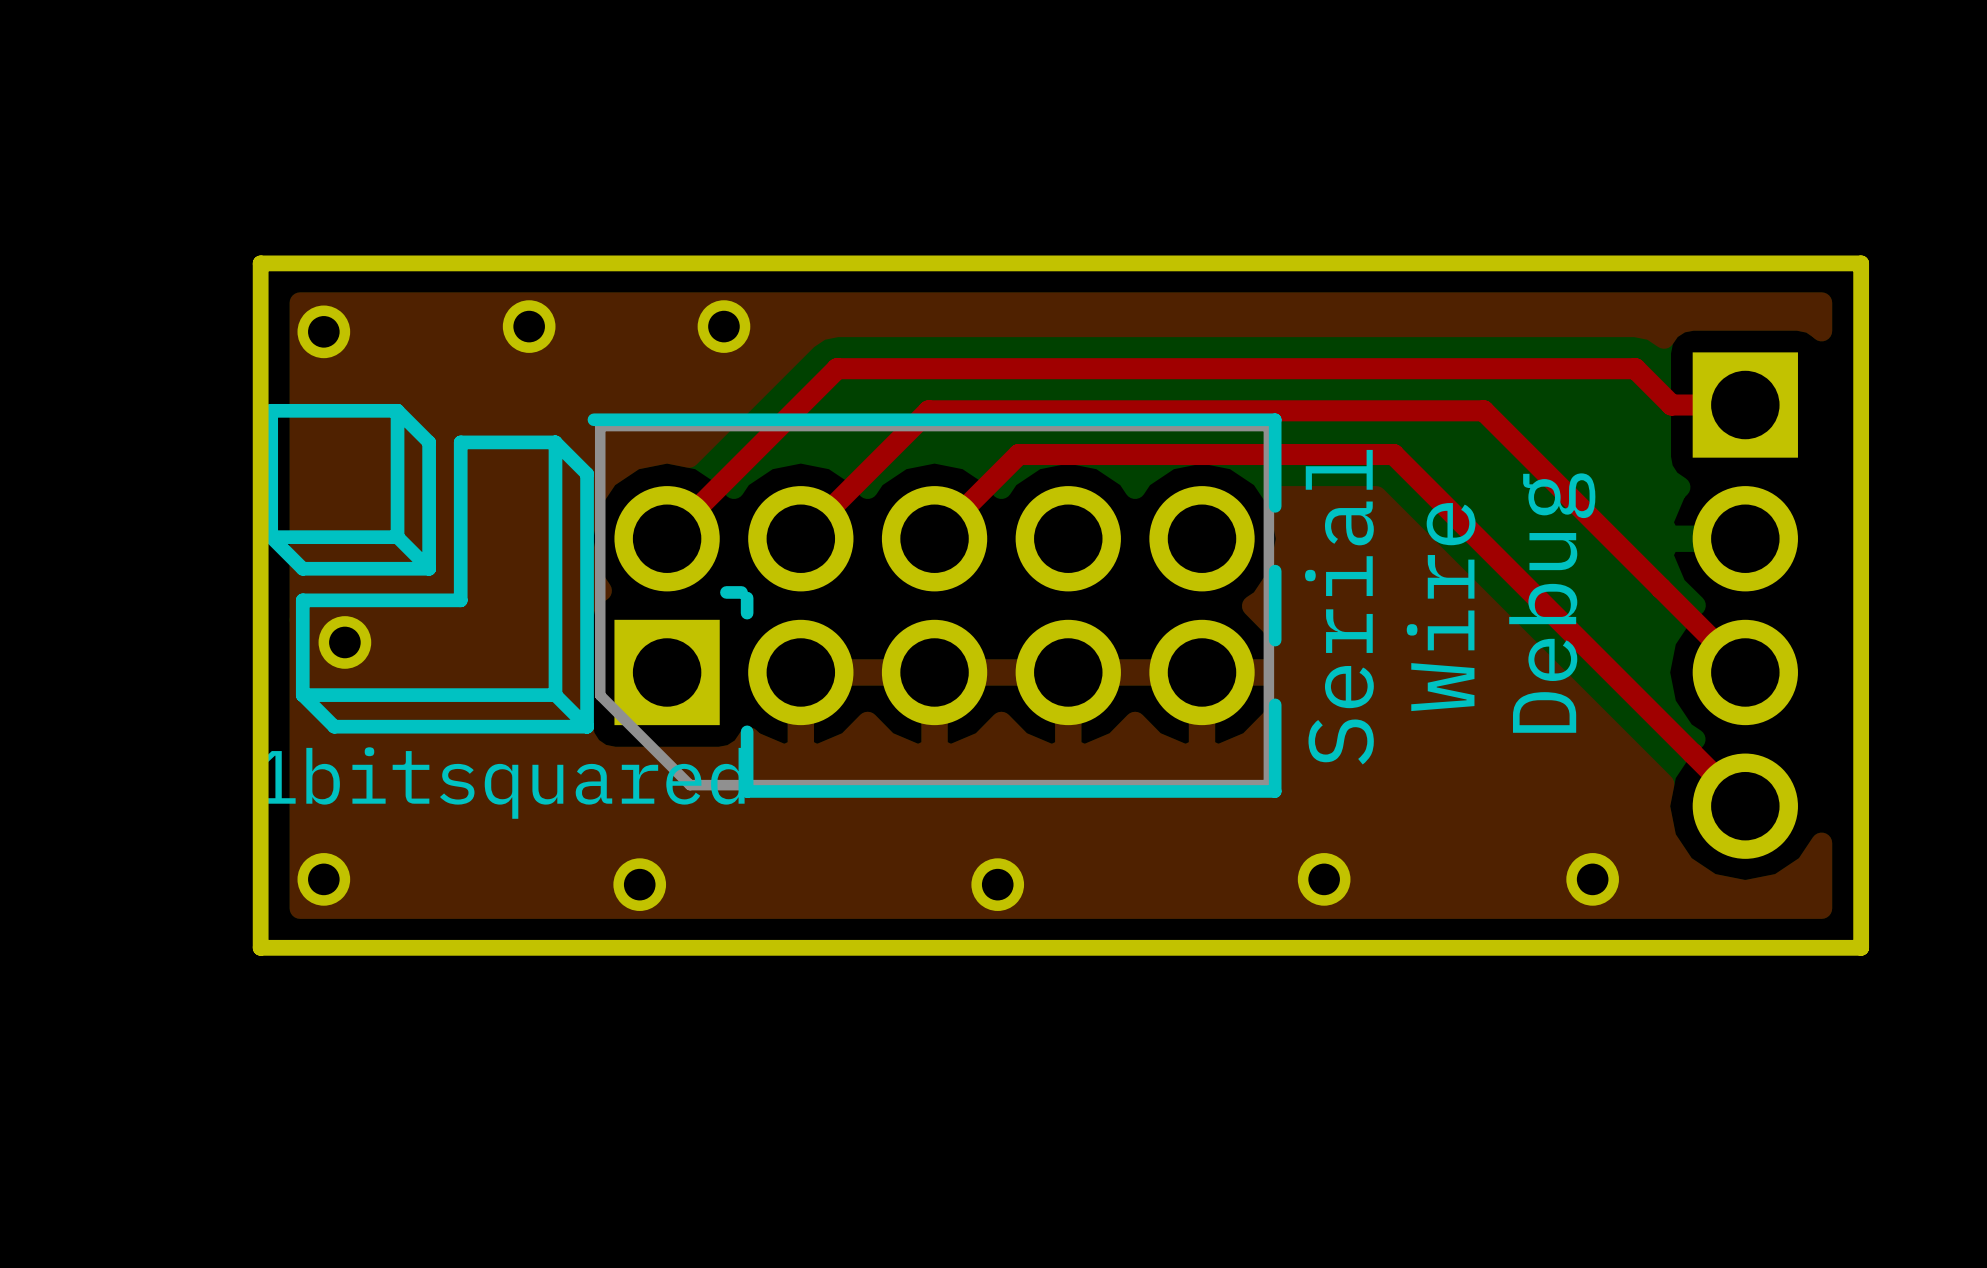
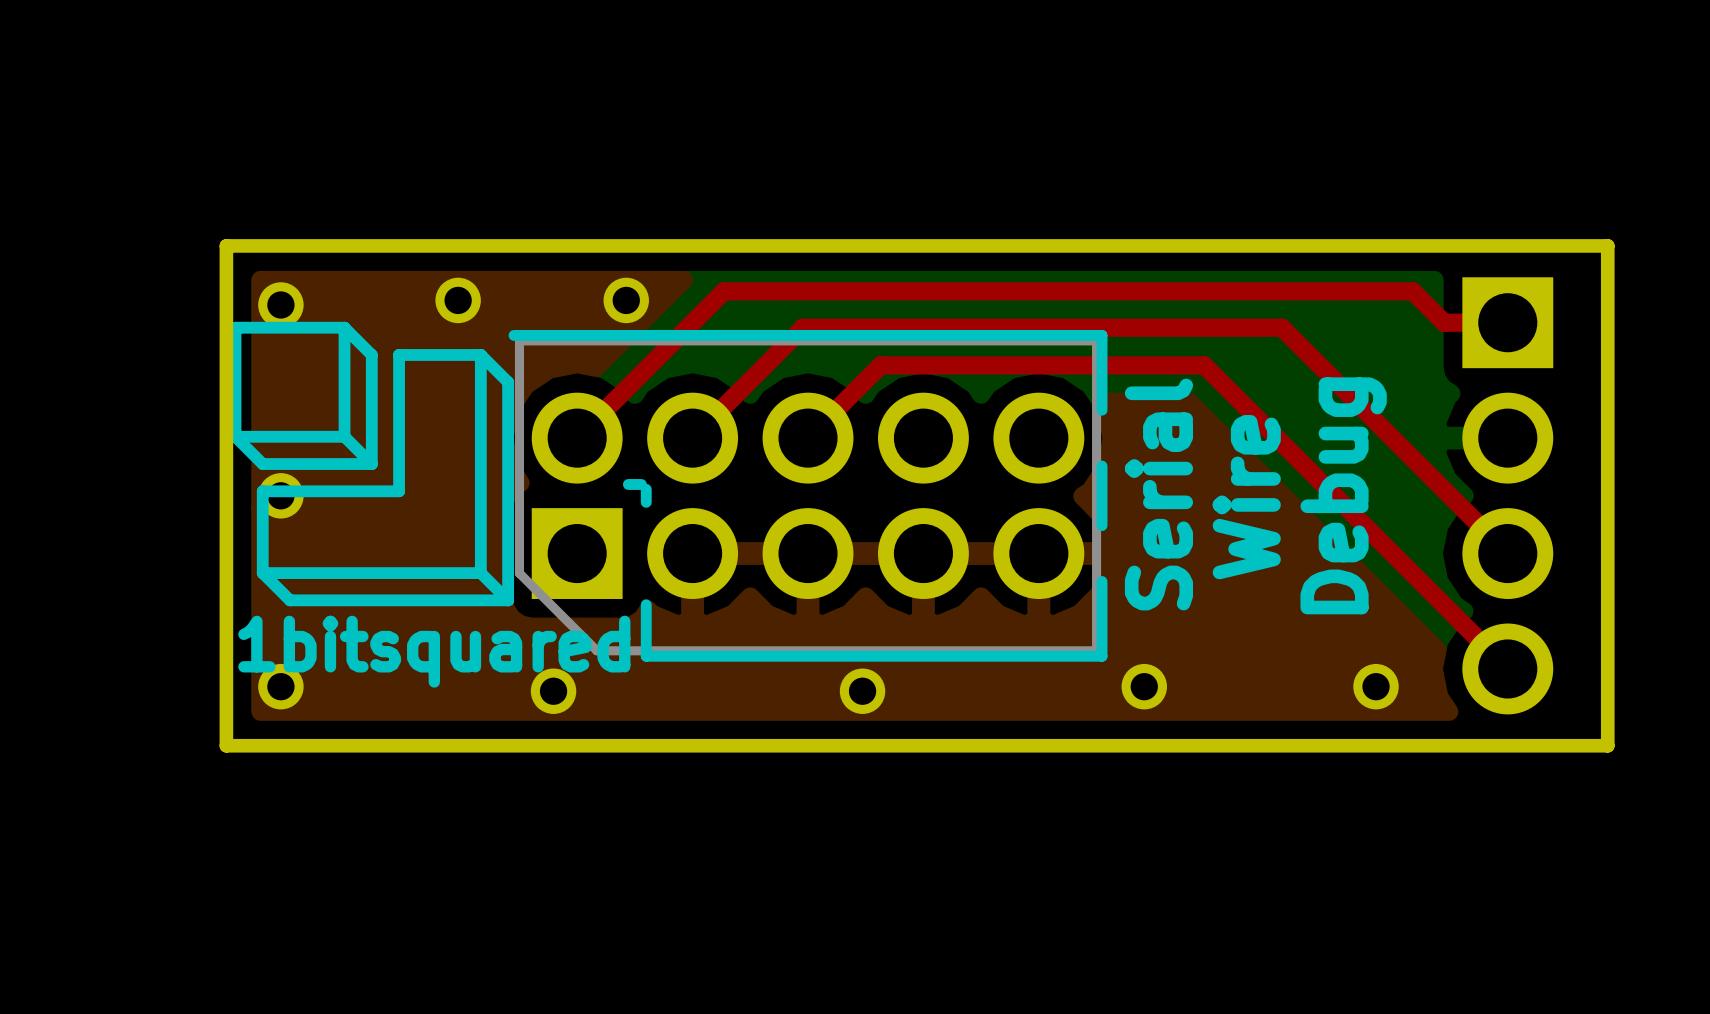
top track: (1745, 405) (1671, 405) (1635, 368) (837, 368) (667, 538) -> (1507, 322) (1444, 322) (1412, 291) (723, 291) (577, 438)
top track: (800, 538) (928, 410) (1483, 410) (1745, 672) -> (692, 438) (803, 327) (1281, 327) (1507, 553)
top track: (934, 538) (1018, 454) (1393, 454) (1745, 806) -> (808, 438) (880, 365) (1204, 365) (1507, 668)
part: none -> (280, 495)
drawing position: (429, 568) -> (371, 464)
text position: Debug (1552, 603) -> Debug (1343, 495)
part position: (934, 605) -> (808, 495)
part position: (1745, 605) -> (1507, 495)
text position: Serial (1339, 607) -> Serial (1158, 494)
text position: Wire (1441, 607) -> Wire (1246, 497)
part: (344, 642) -> none
part: none -> (280, 686)
text position: 1bitsquared (501, 783) -> 1bitsquared (434, 651)
board edge: (260, 842) (260, 947) (1861, 947) (1861, 842) -> (226, 745) (1607, 745)
part: (323, 879) -> none
part position: (1324, 879) -> (1144, 686)
part position: (1592, 879) -> (1376, 686)
part position: (639, 884) -> (553, 691)
part position: (997, 884) -> (862, 691)

